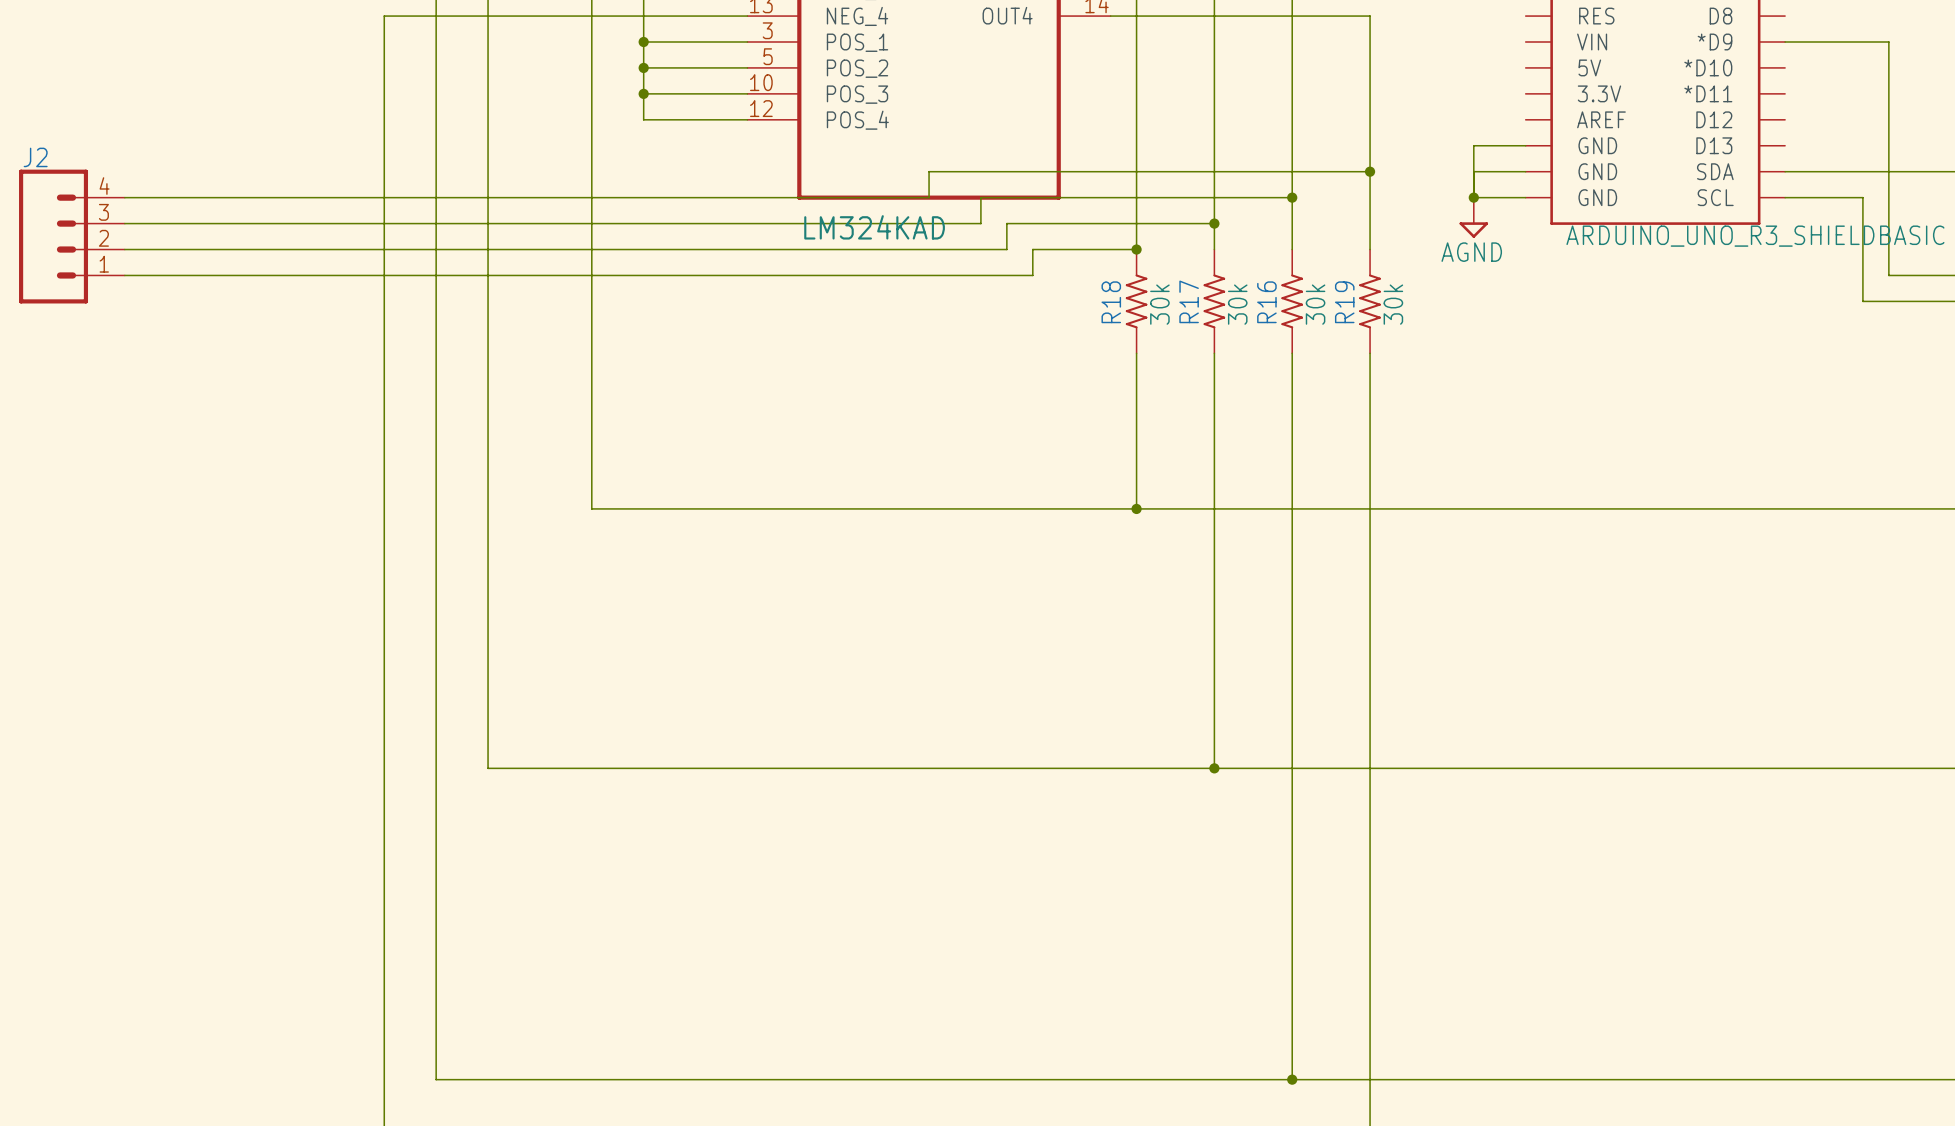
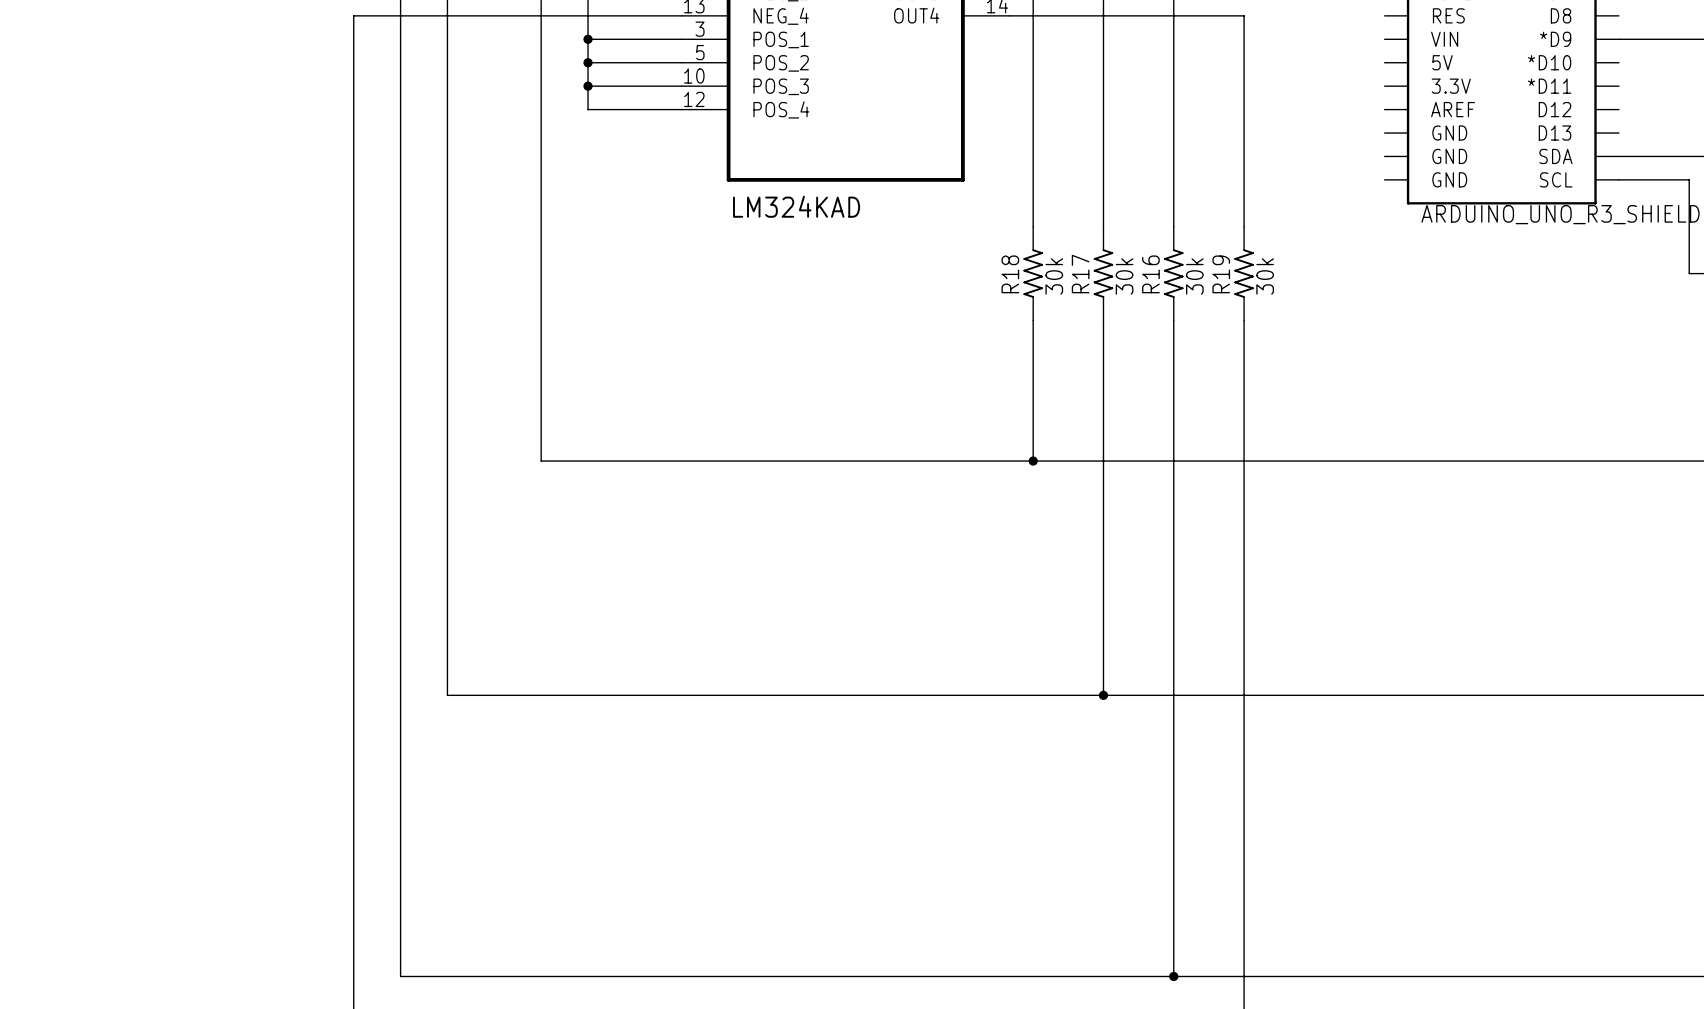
wire: (1525, 145) (1473, 145) (1473, 197) (1525, 197) -> none
wire: (1370, 171) (929, 171) (929, 197) (124, 197) -> none
junction: (1370, 171) -> none
wire: (1473, 171) (1525, 171) -> none
wire: (1292, 197) (980, 197) (980, 223) (124, 223) -> none
junction: (1292, 197) -> none
junction: (1473, 197) -> none
power symbol: AGND (1473, 217) -> none
wire: (1214, 223) (1006, 223) (1006, 249) (124, 249) -> none
junction: (1214, 223) -> none
J2: (71, 236) -> none
wire: (1136, 249) (1032, 249) (1032, 275) (124, 275) -> none
junction: (1136, 249) -> none

